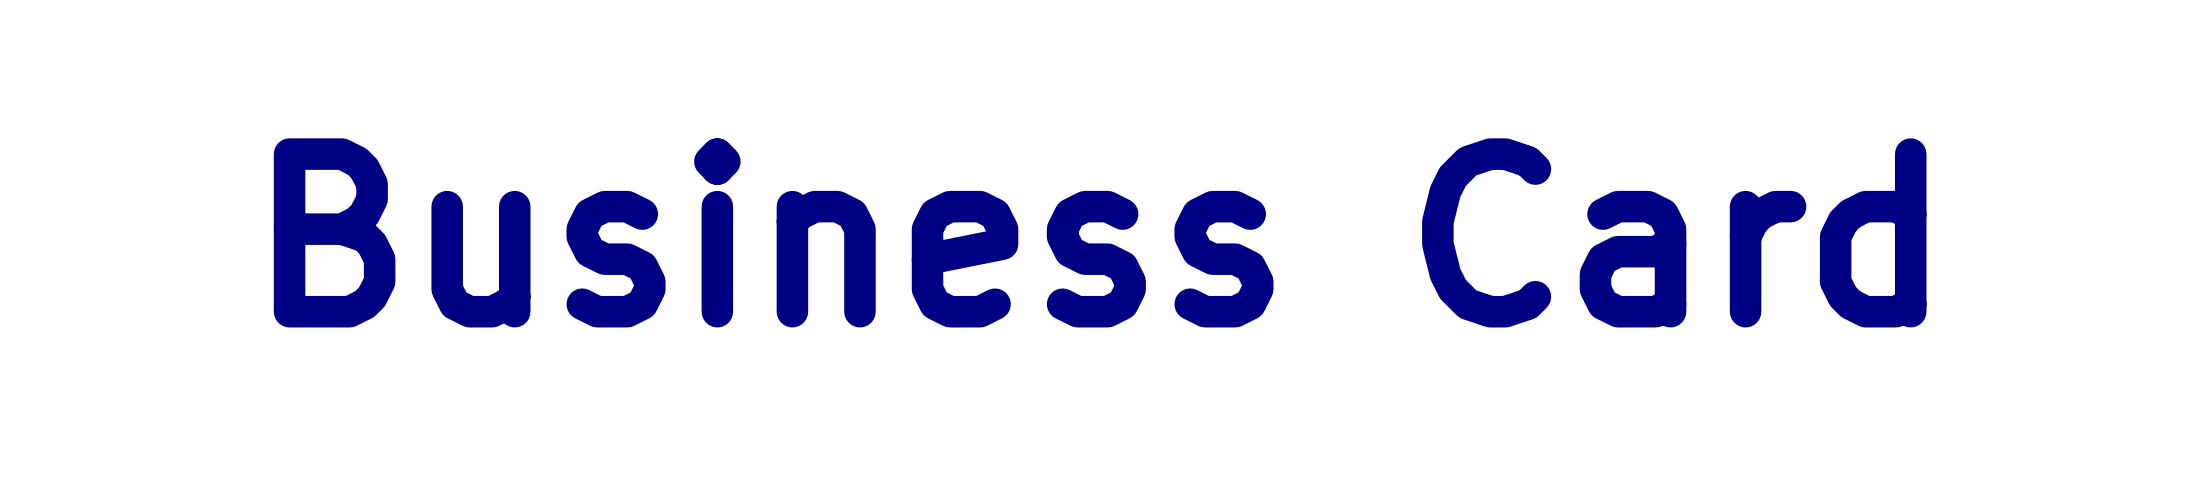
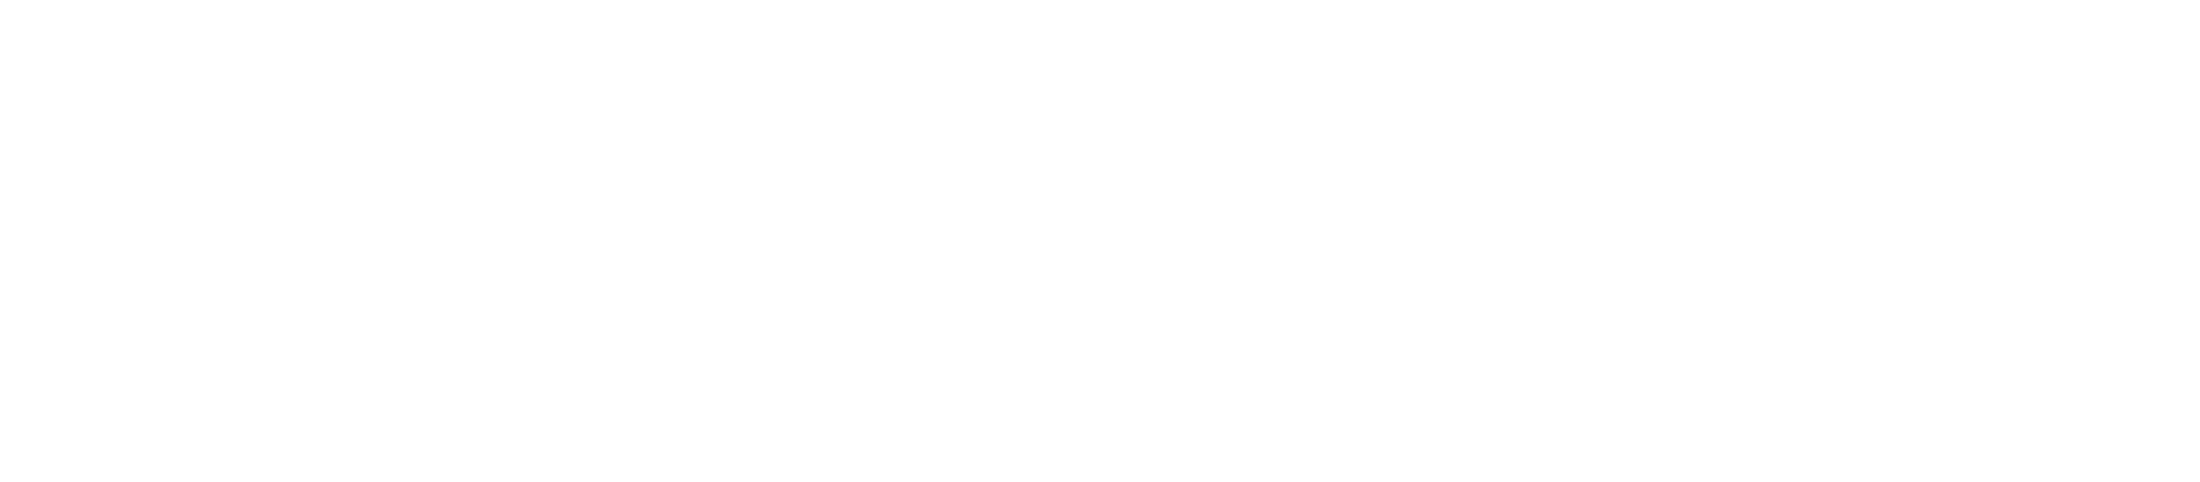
text: Business Card (1100, 232) -> none

